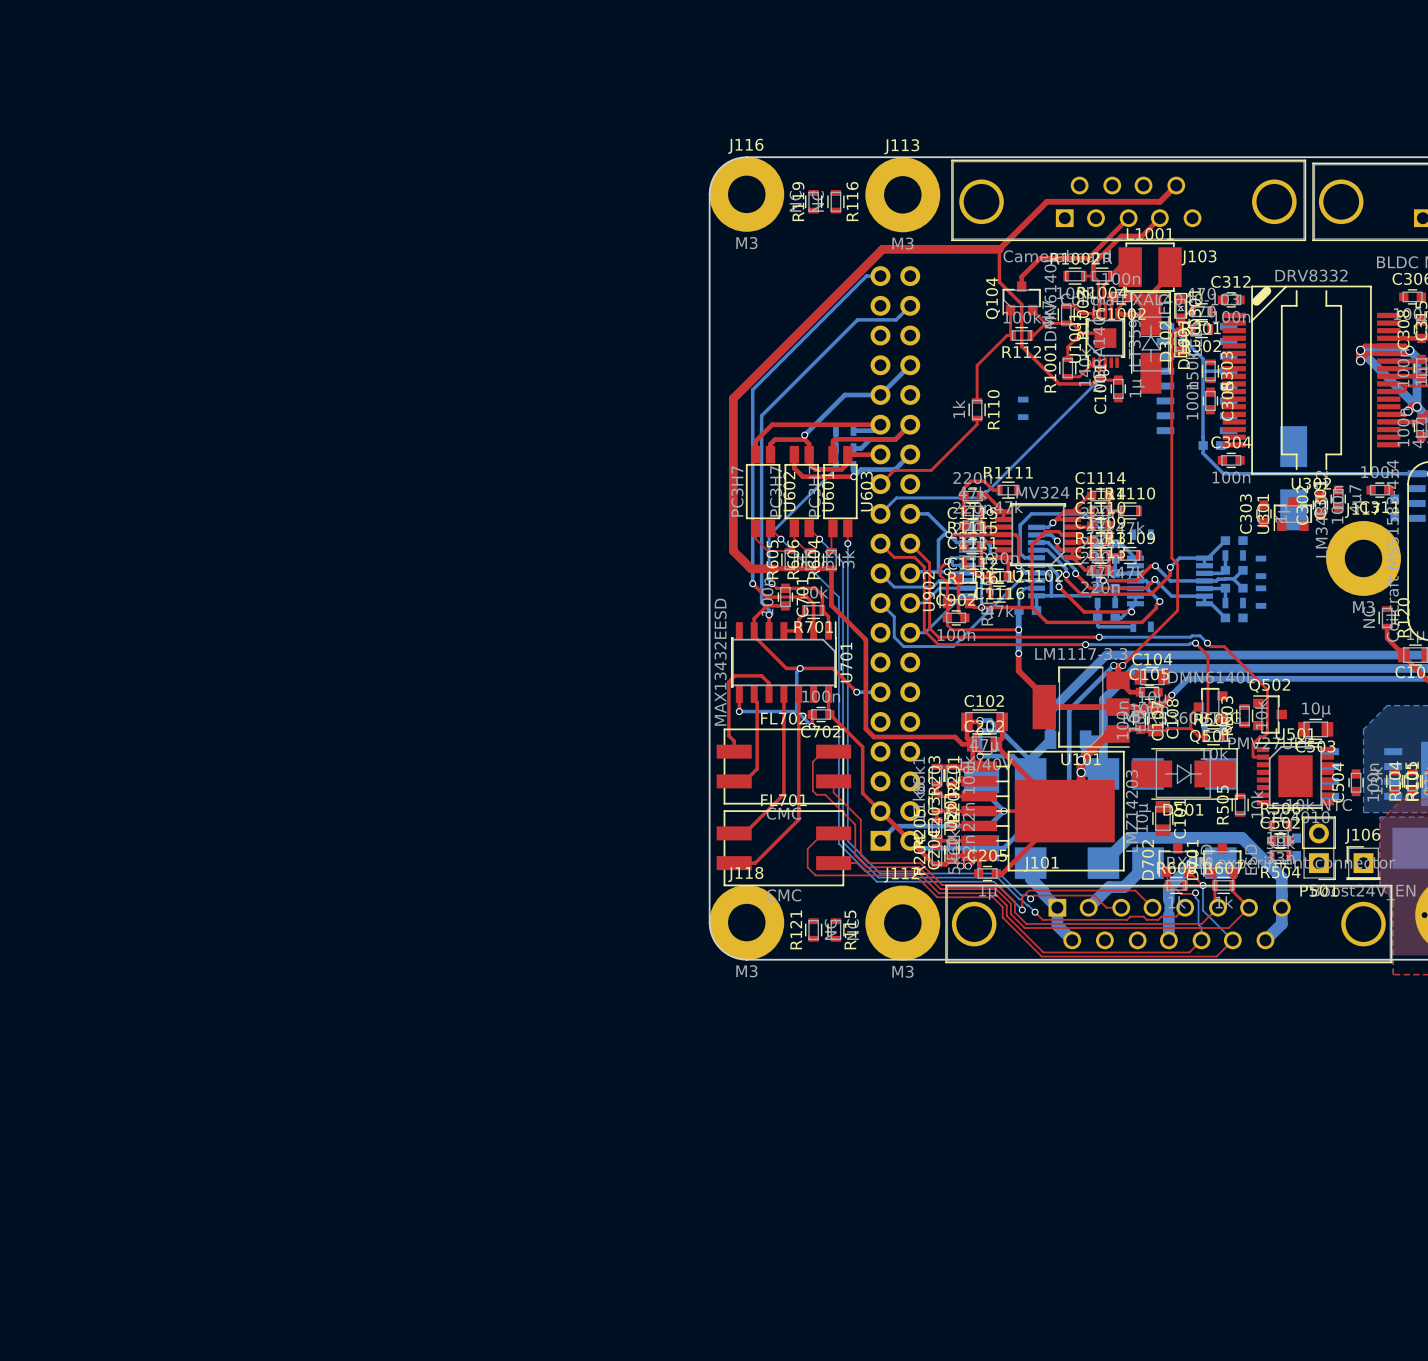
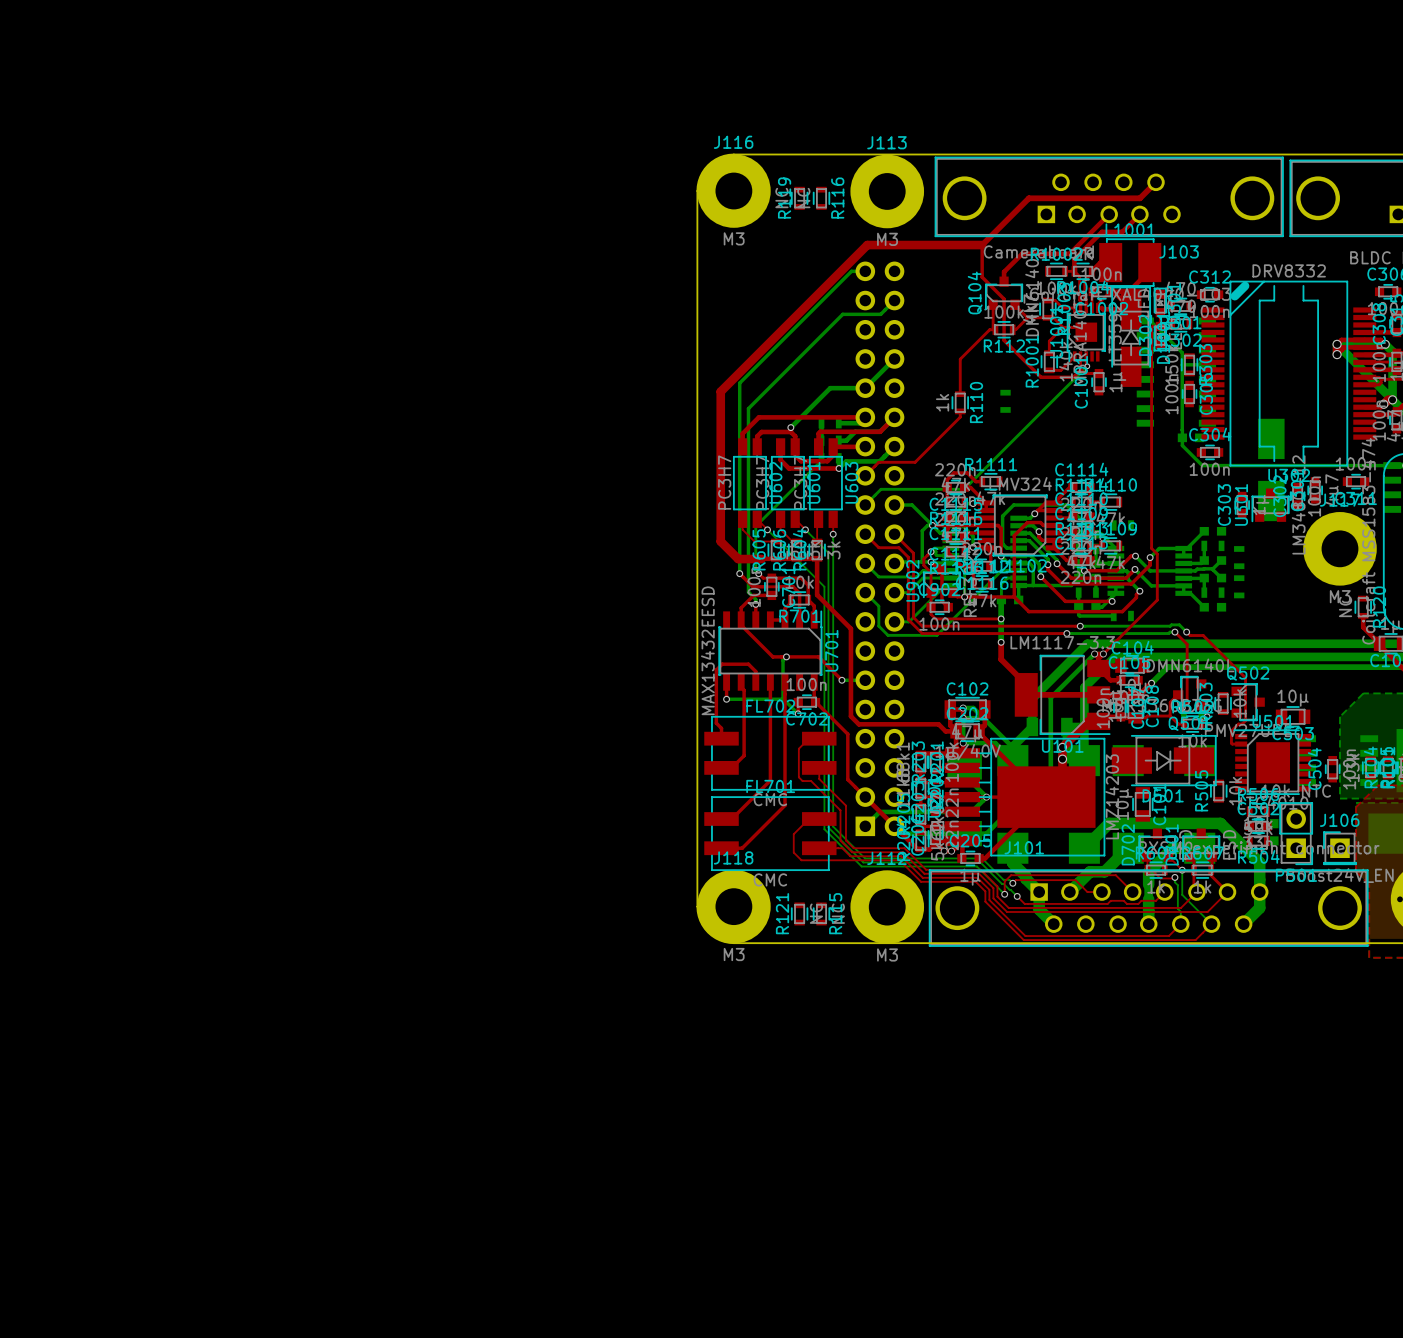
part: (1394, 507) -> none

